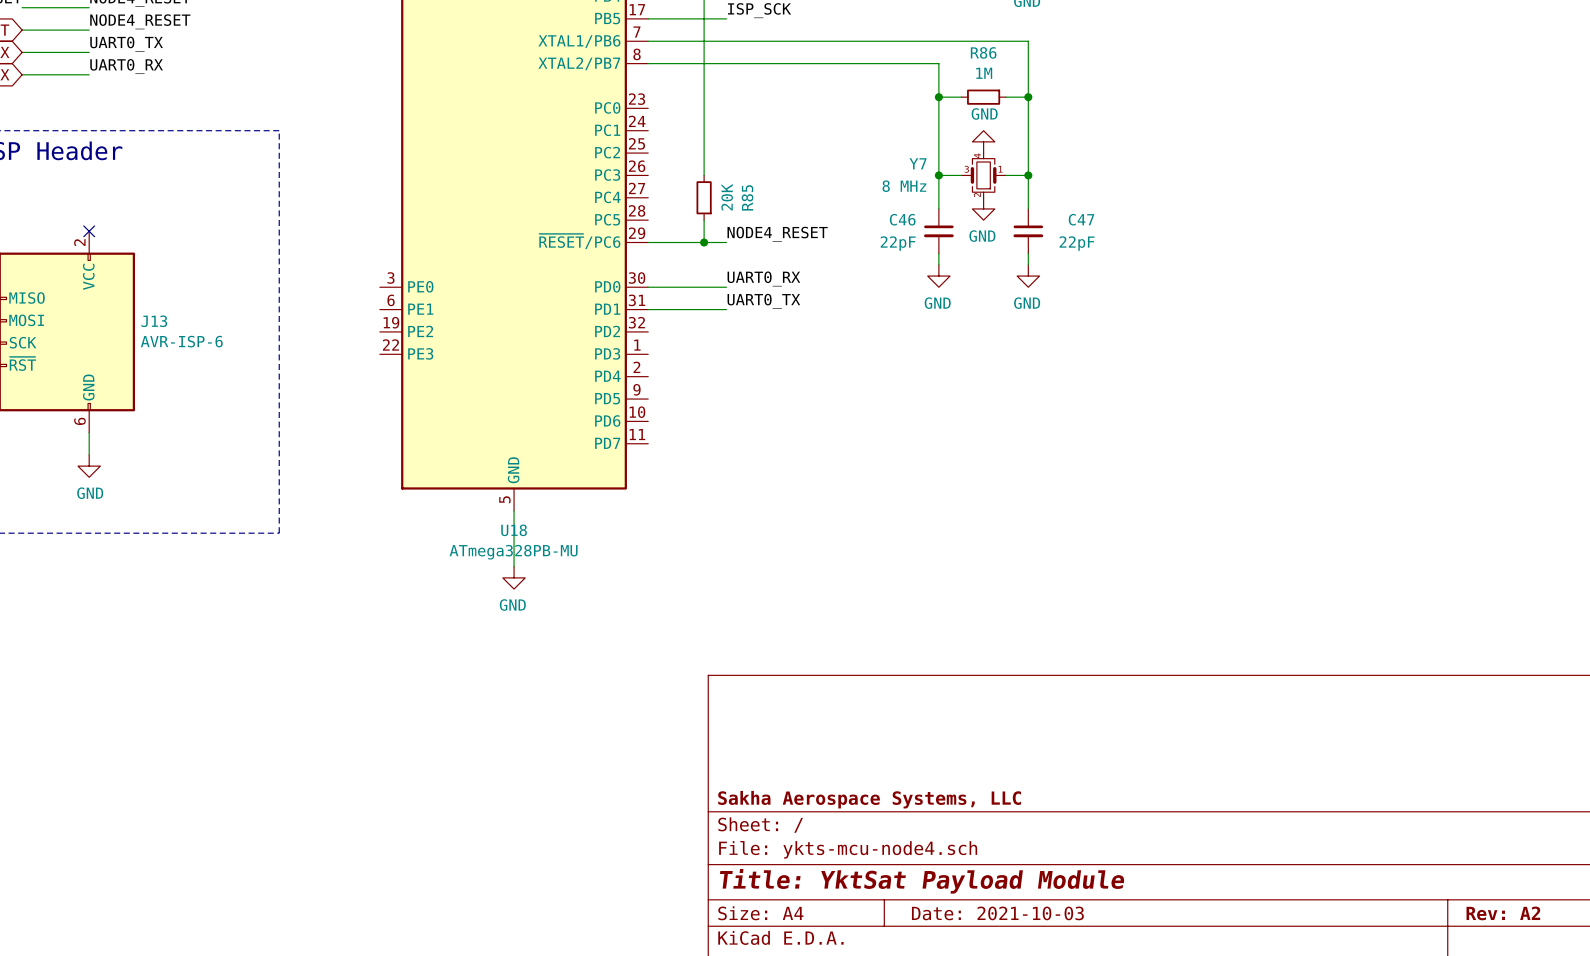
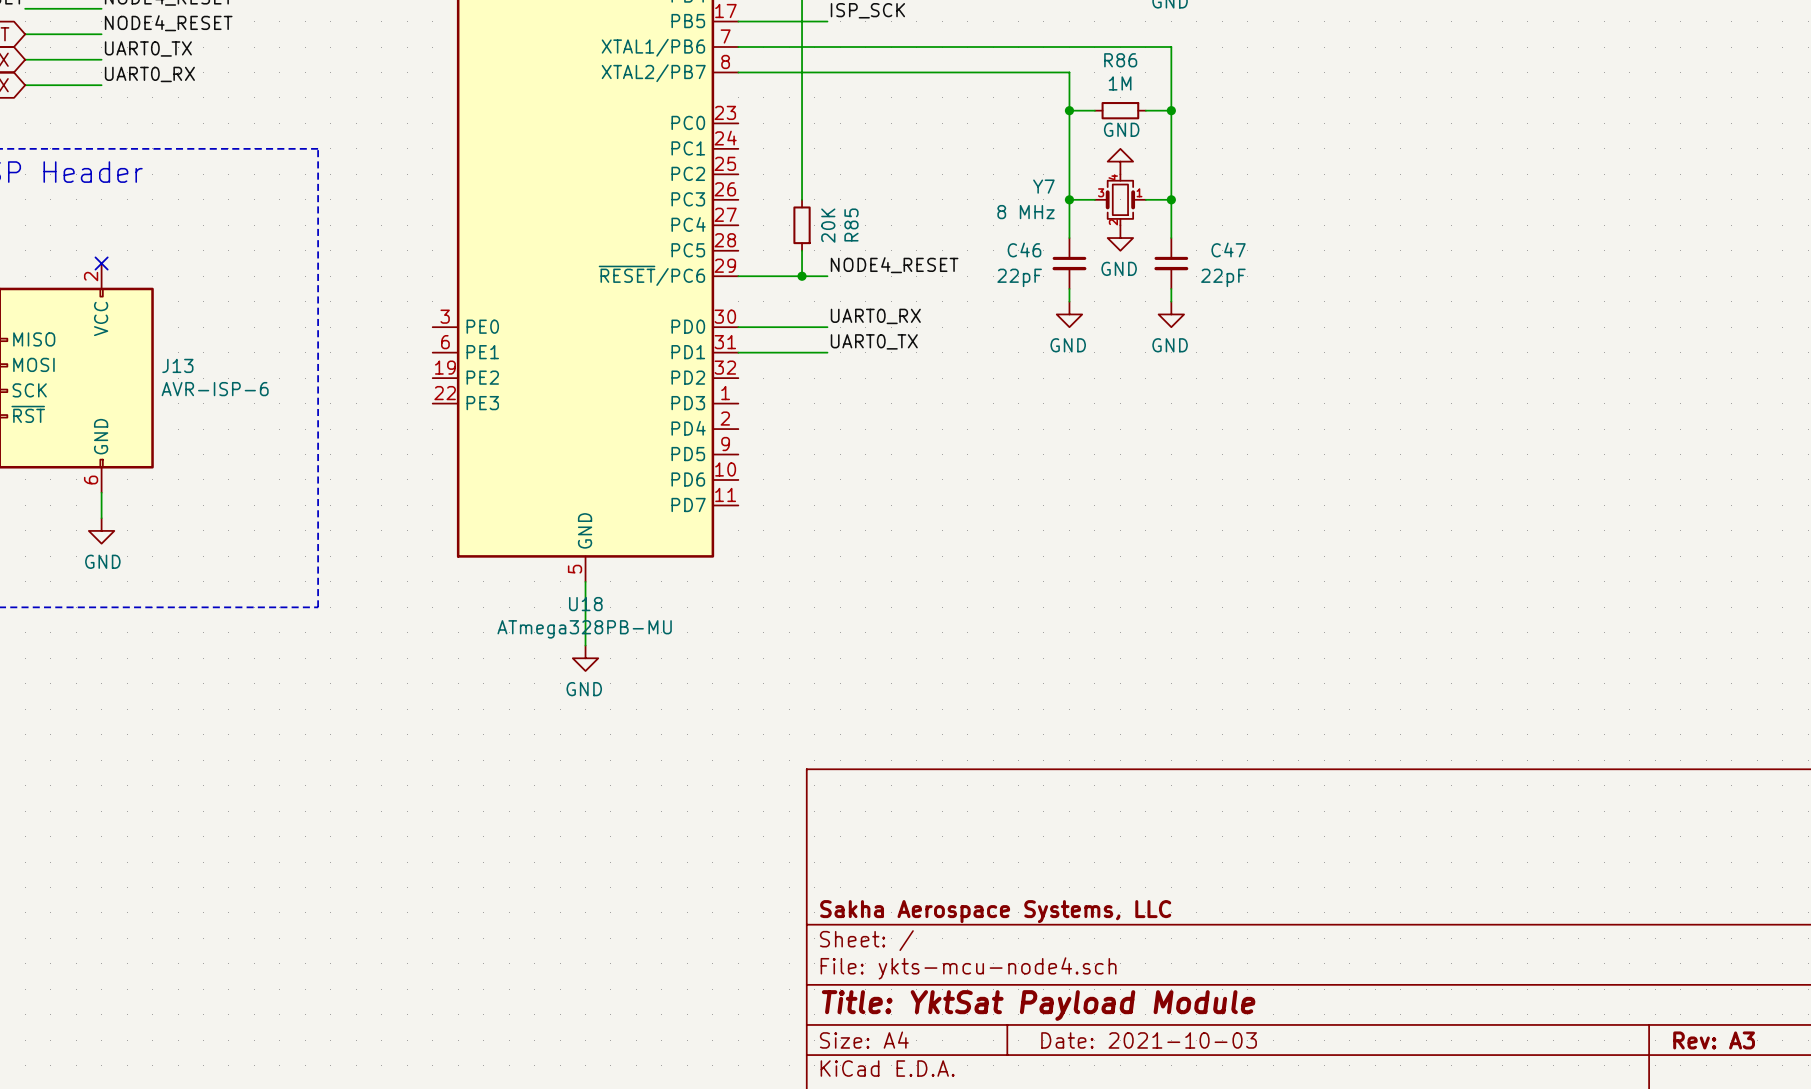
title block: Rev: A2 (1503, 913) -> Rev: A3 (1714, 1040)

